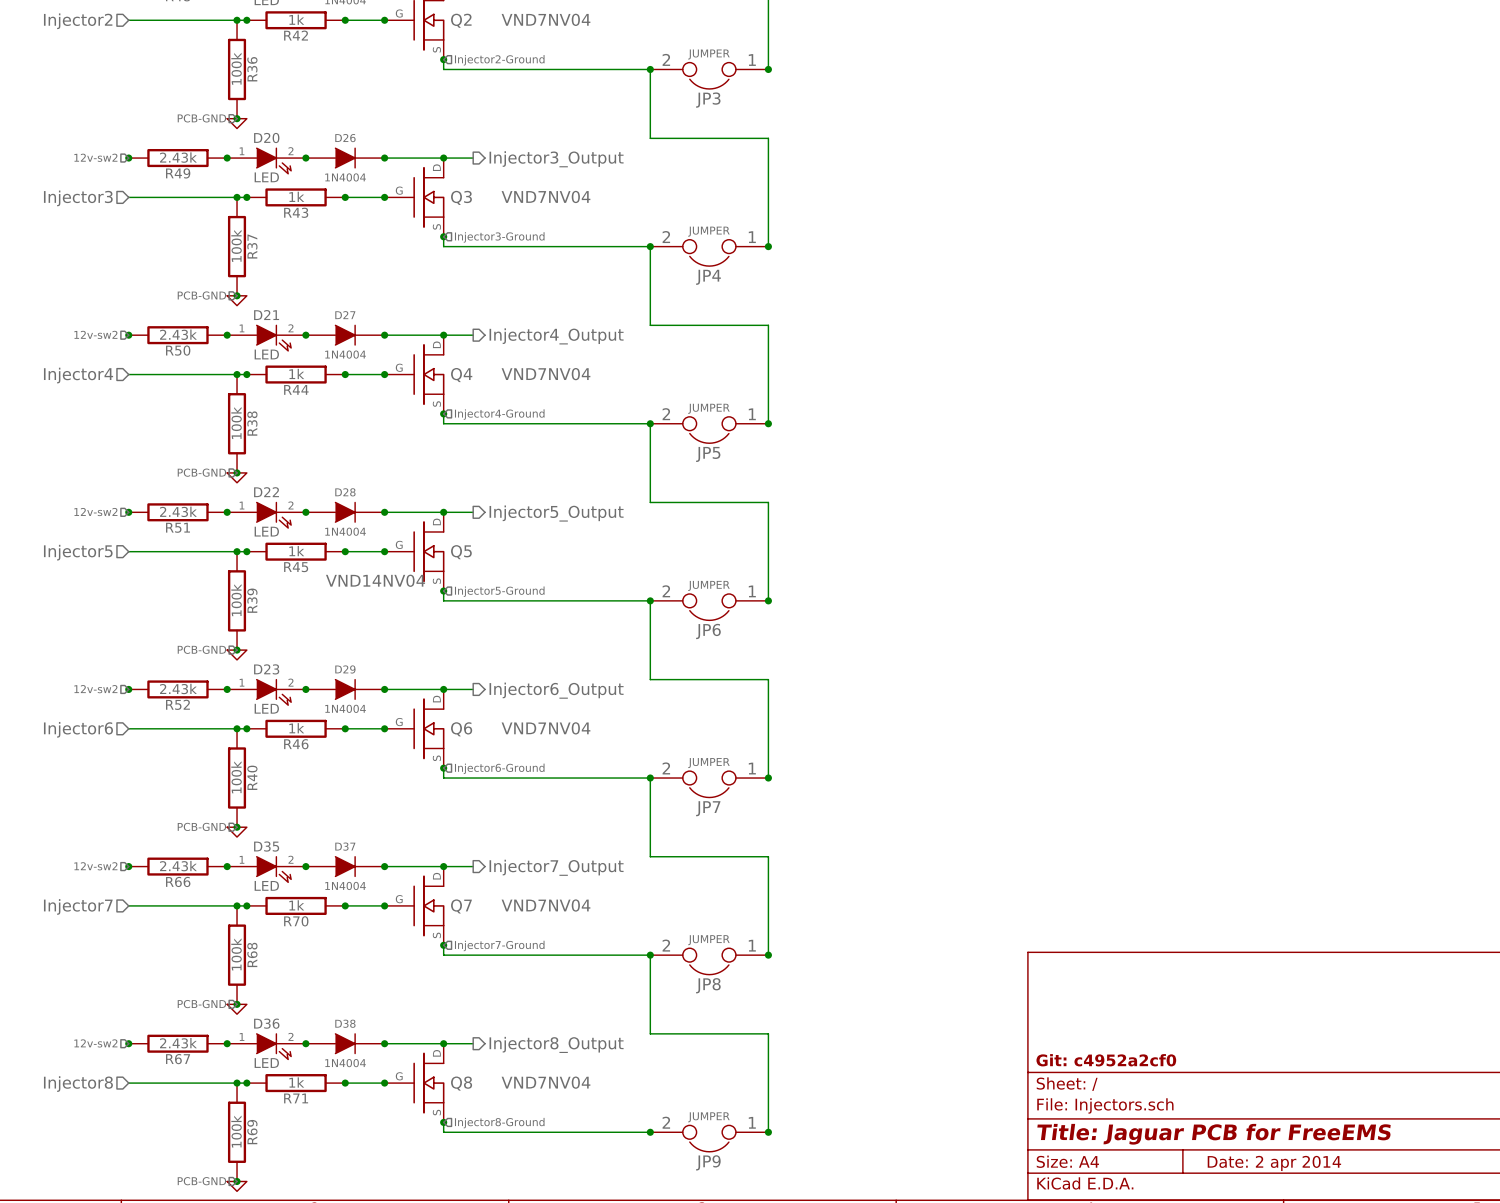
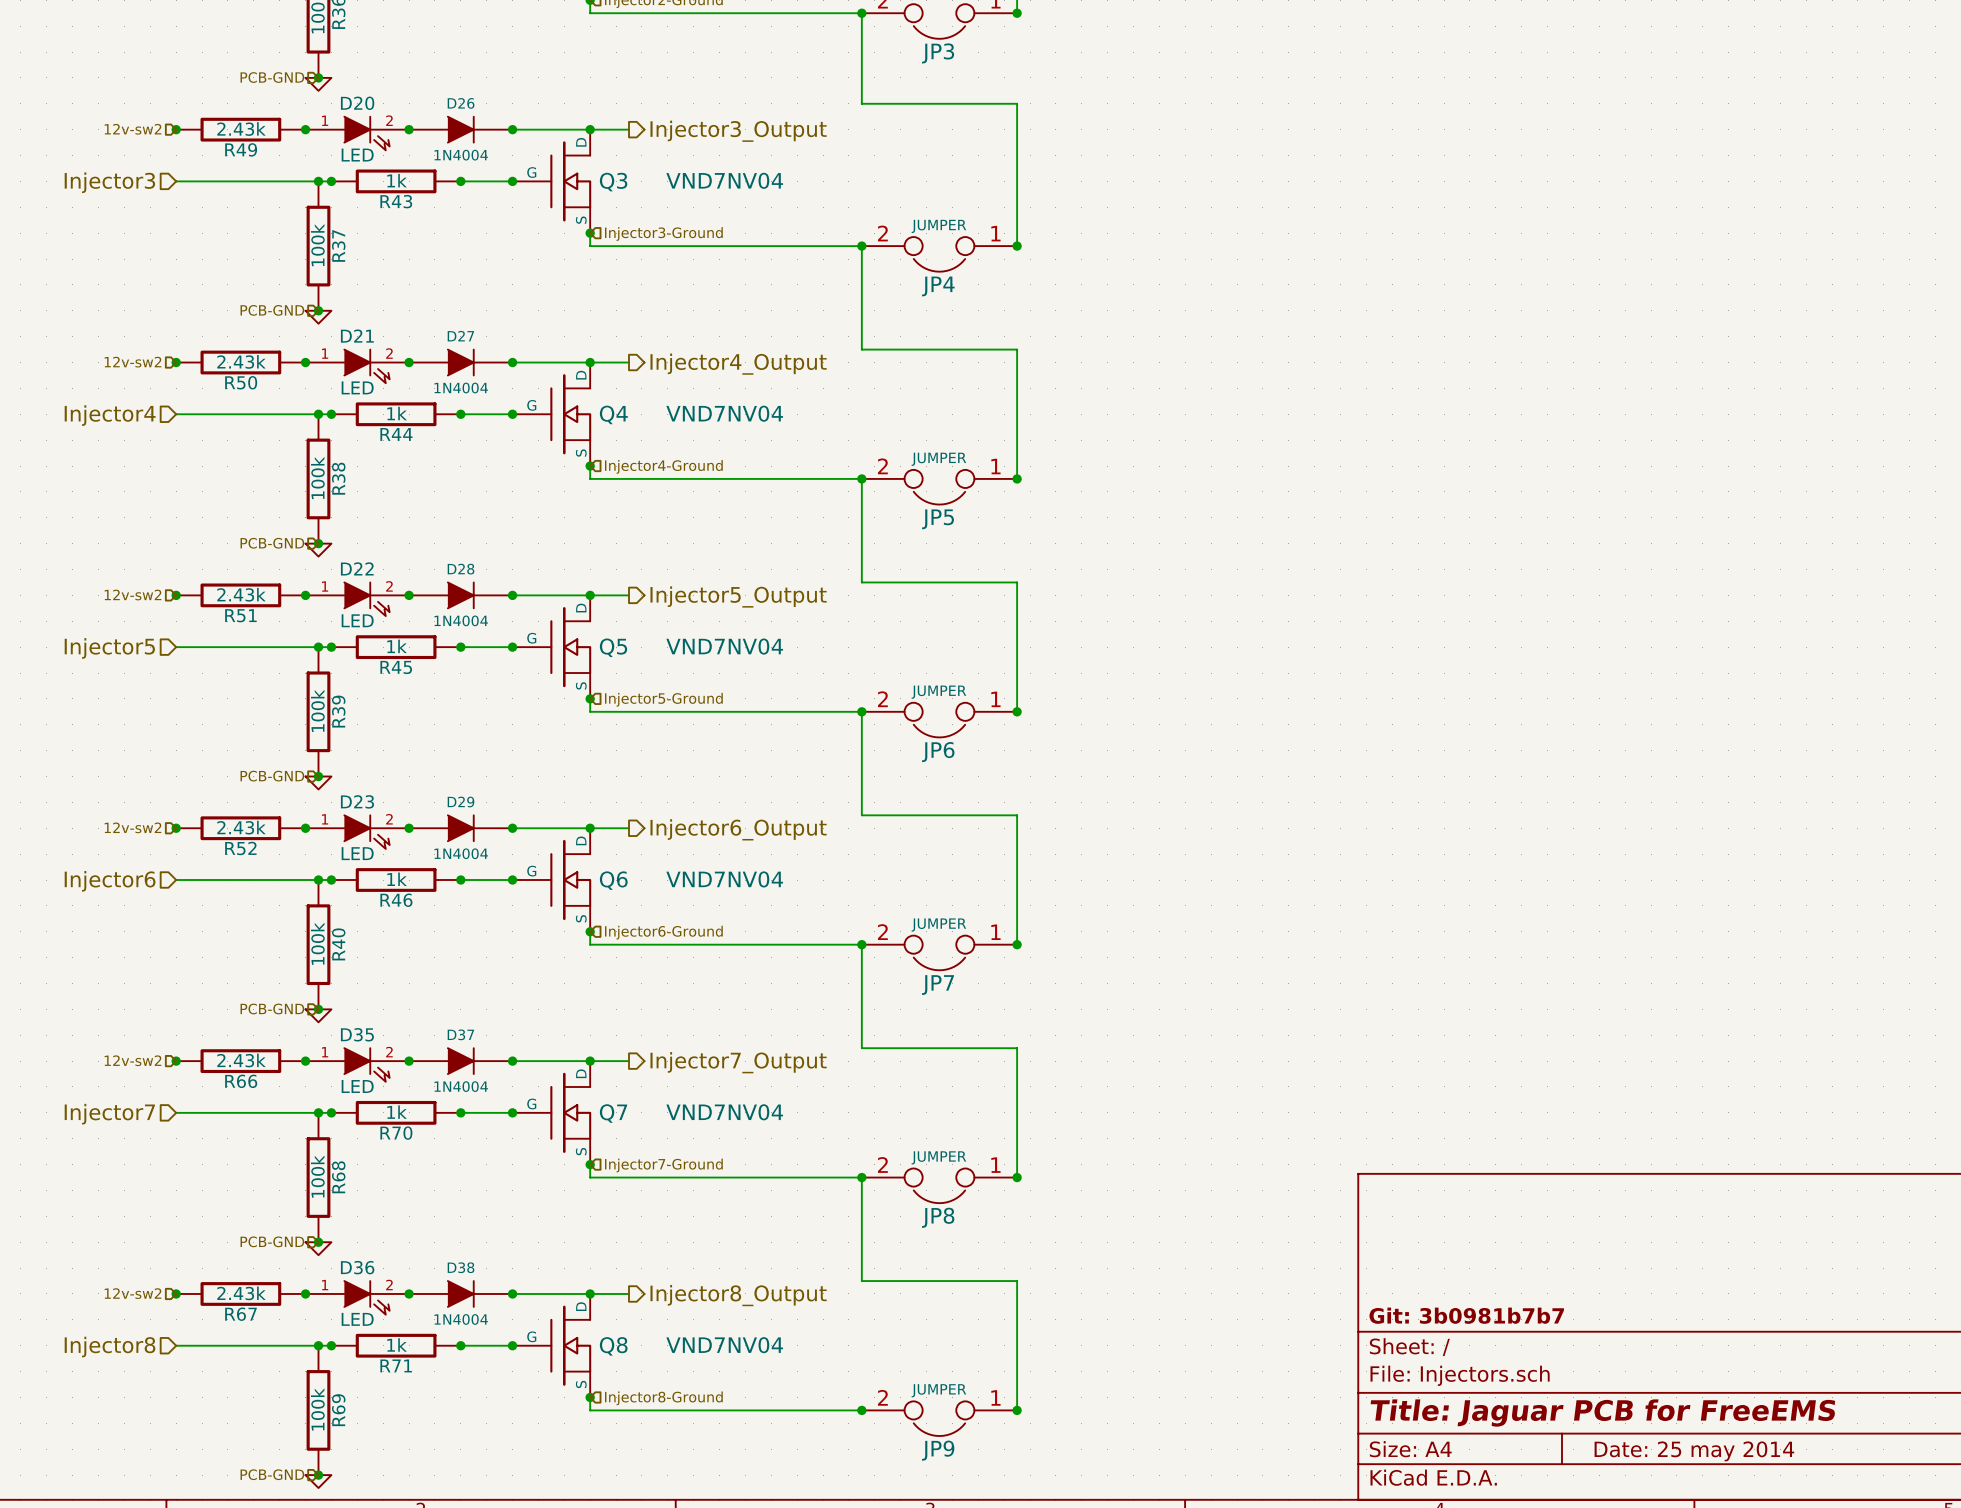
Q5 value: VND14NV04 (375, 580) -> VND7NV04 (724, 646)
title block: Git: c4952a2cf0 (1106, 1060) -> Git: 3b0981b7b7 (1466, 1315)
title block: Date: 2 apr 2014 (1274, 1163) -> Date: 25 may 2014 (1694, 1451)

